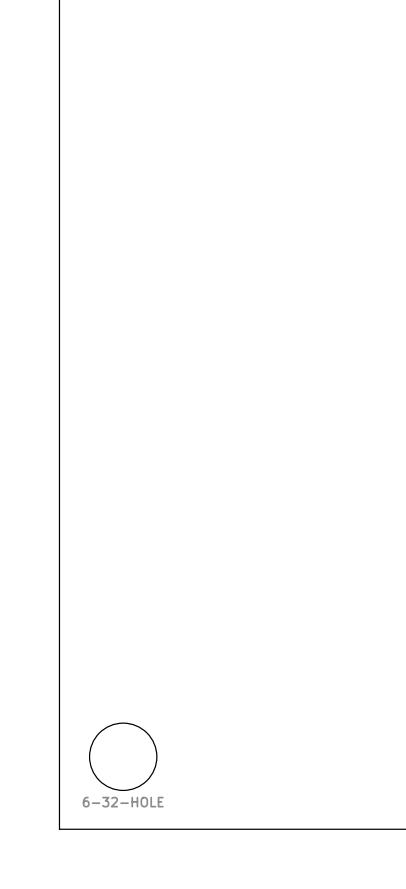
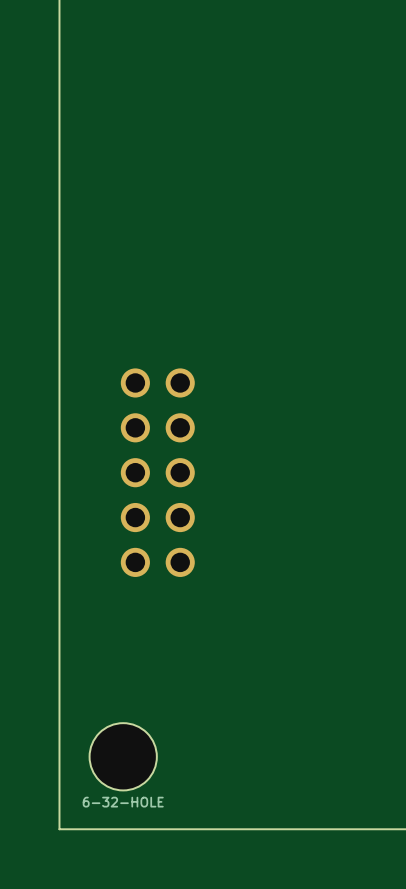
part: none -> (157, 472)

